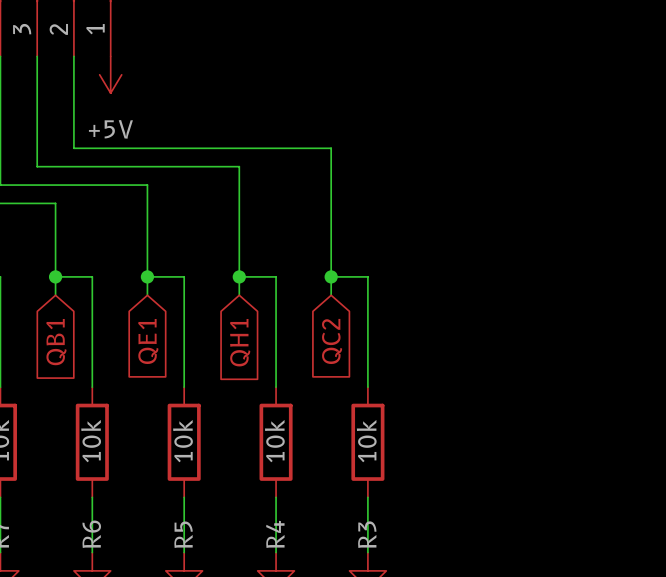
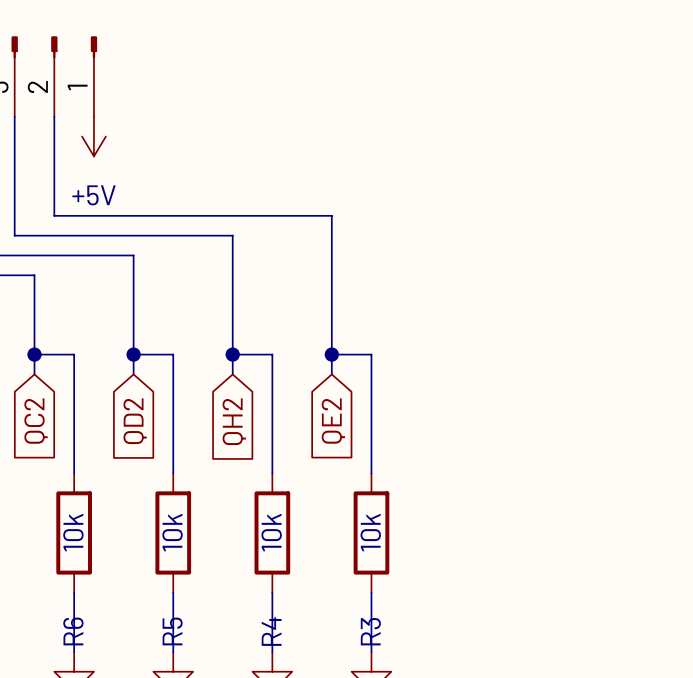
global label: QE1 (148, 341) -> QD2 (135, 421)
global label: QC2 (332, 341) -> QE2 (333, 421)
global label: QB1 (56, 342) -> QC2 (36, 421)
global label: QH1 (240, 342) -> QH2 (234, 421)

